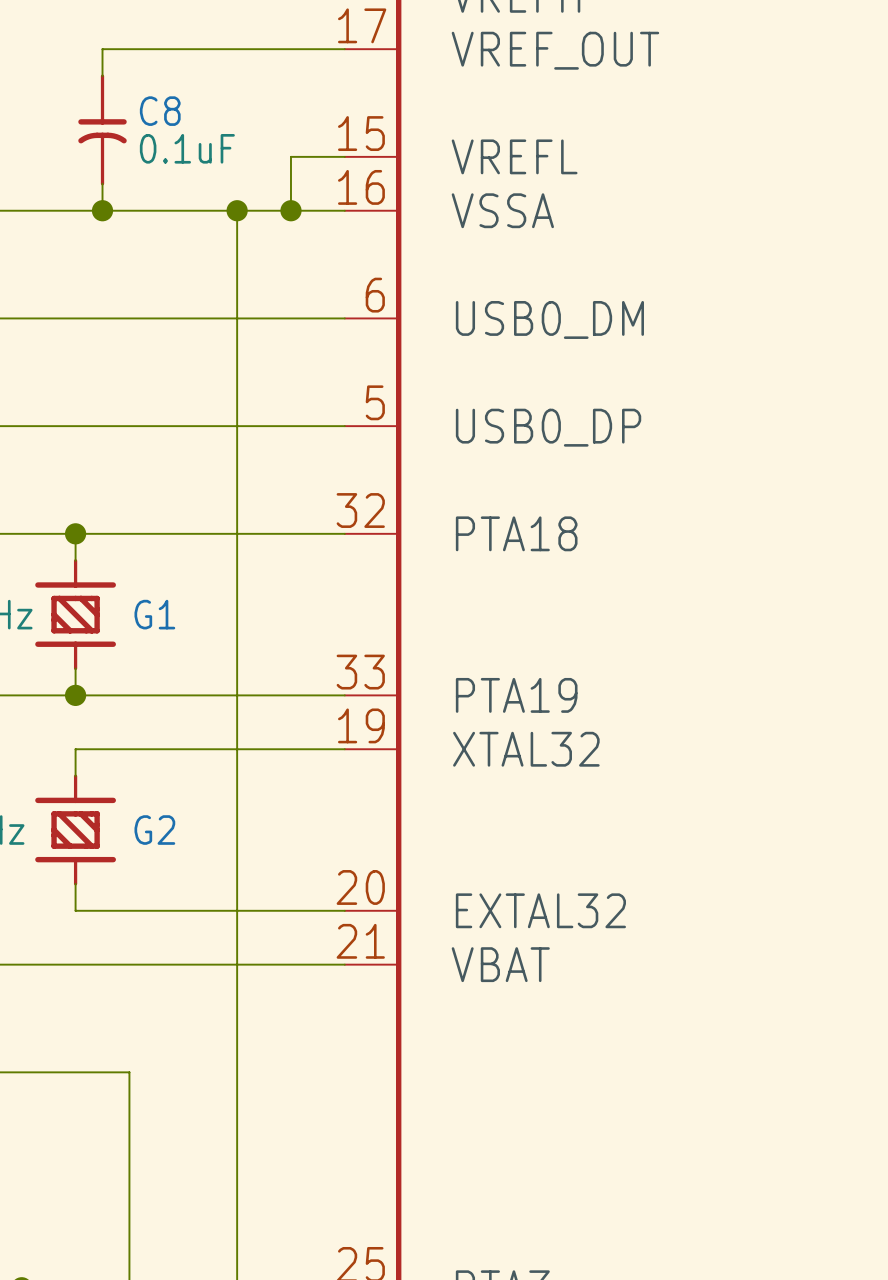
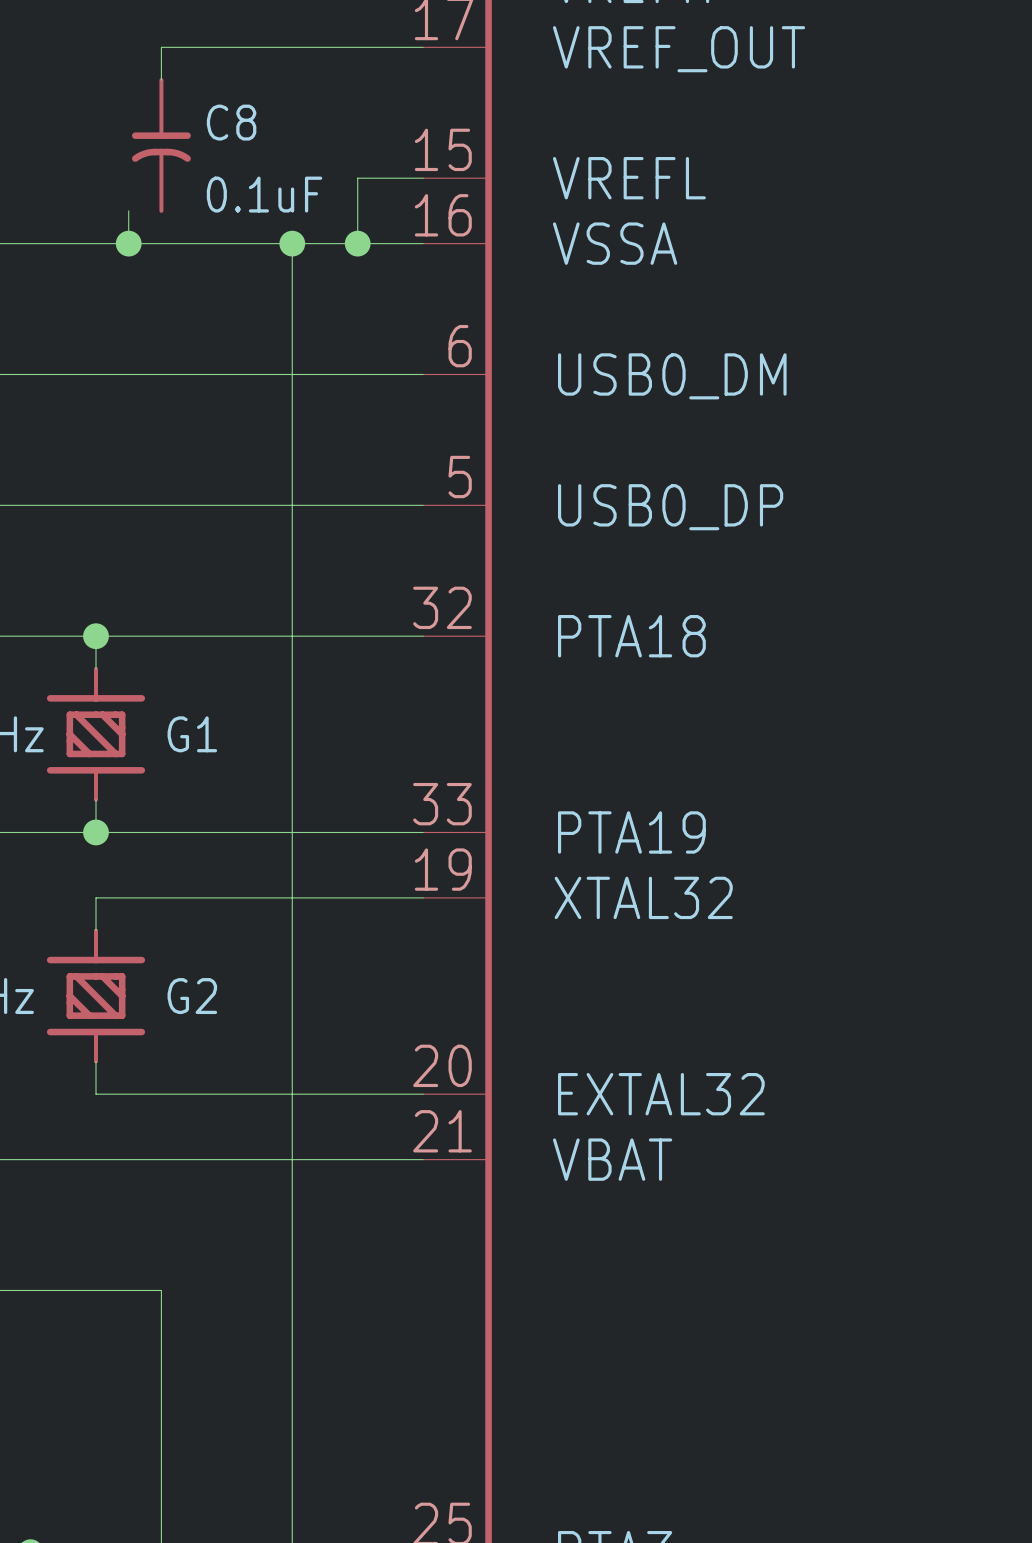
wire: (129, 49) (102, 49) (102, 76) -> (161, 47) (161, 80)
C8 position: (102, 129) -> (161, 145)
C8 value position: 0.1uF (187, 148) -> 0.1uF (264, 194)

